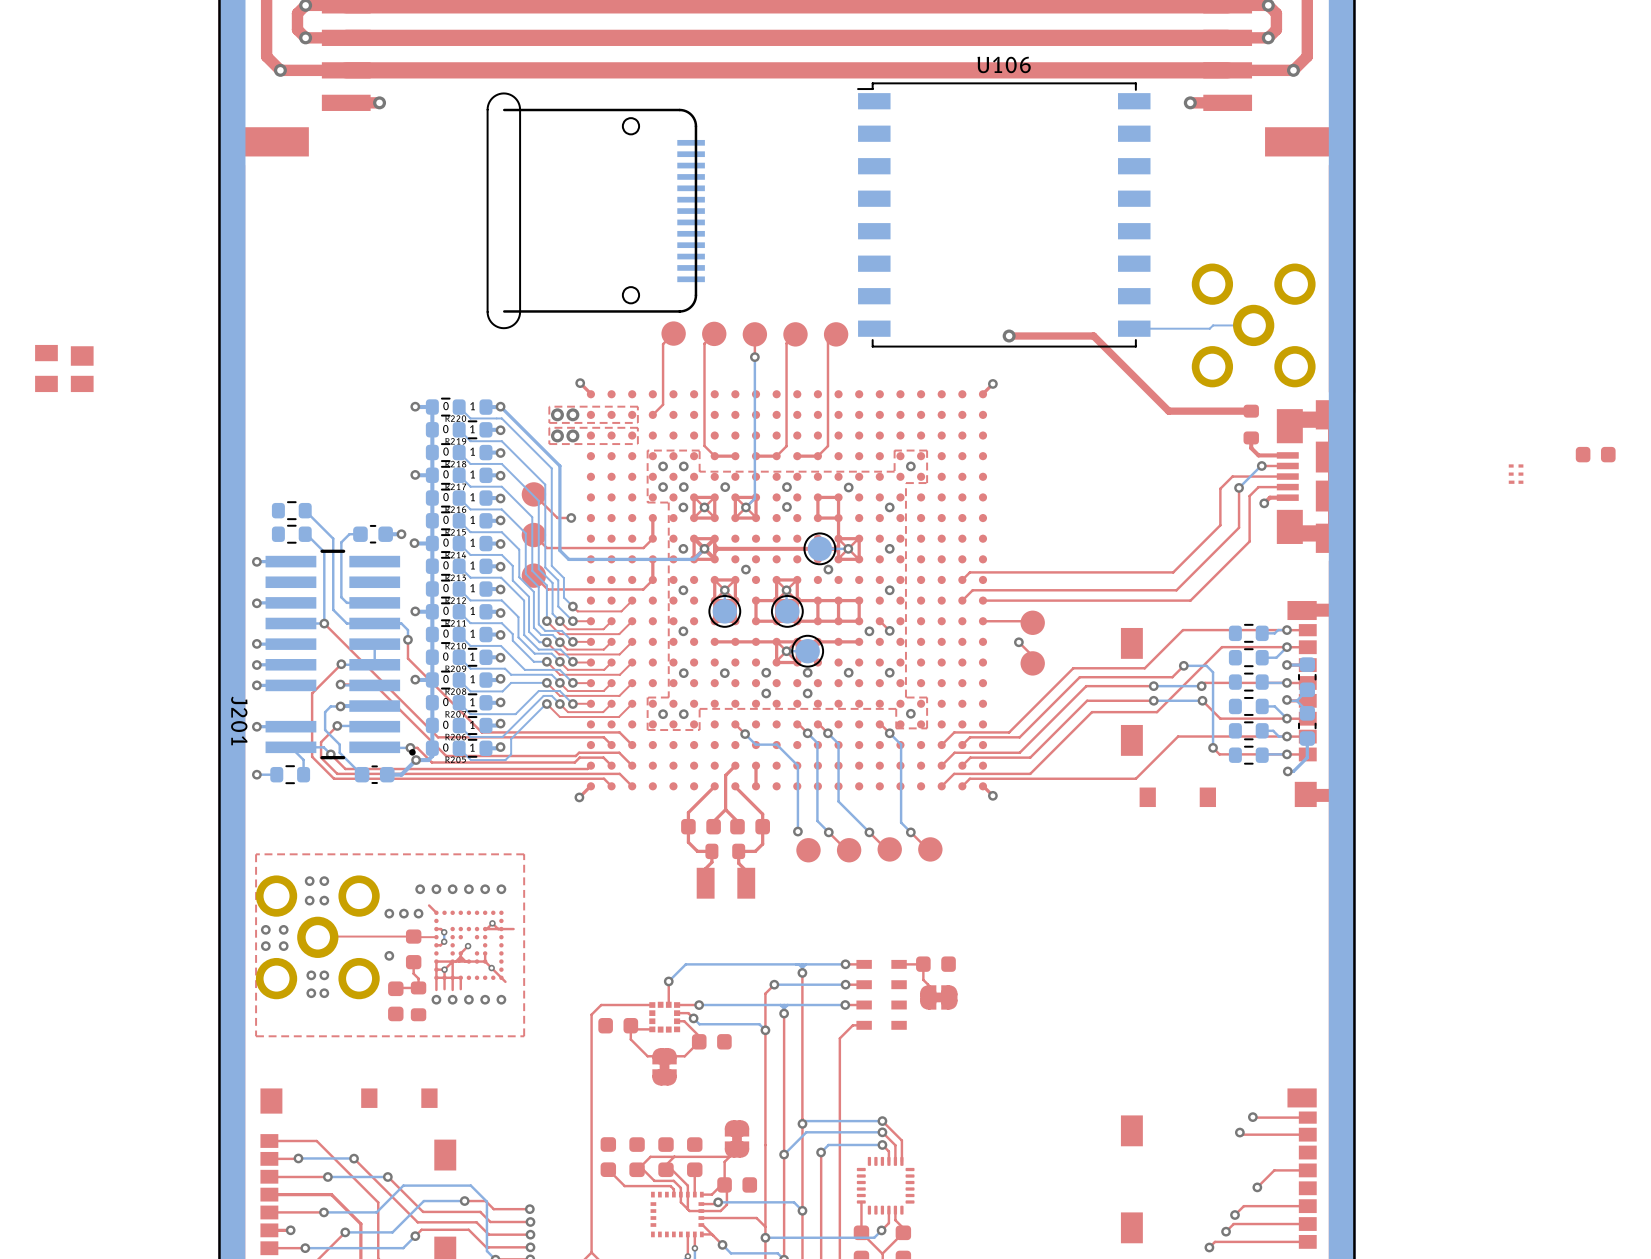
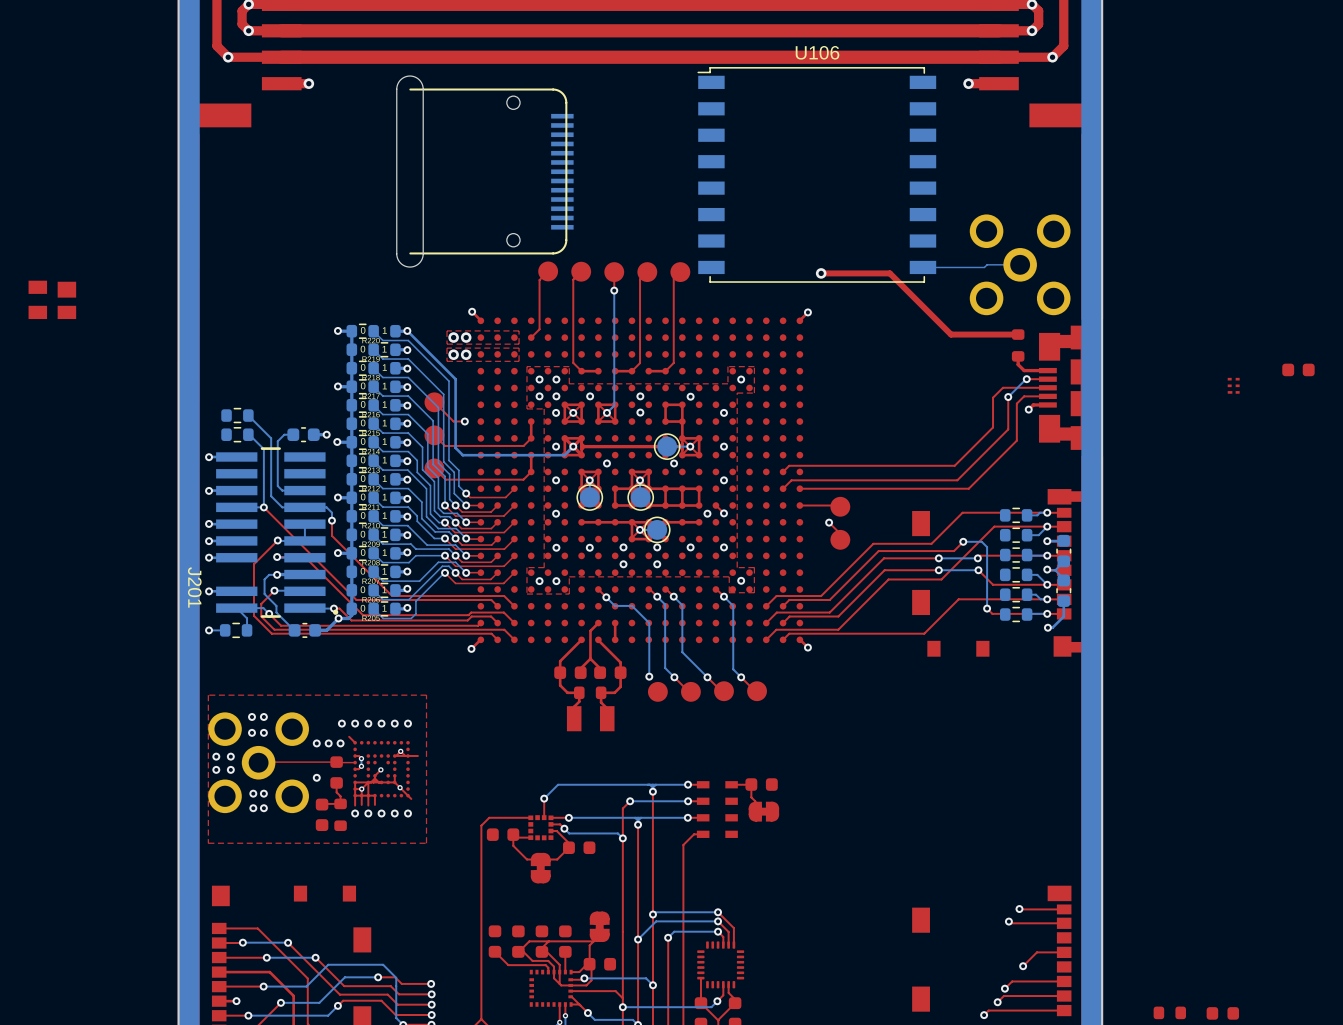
part: none -> (1169, 1012)
part: none -> (1222, 1013)

